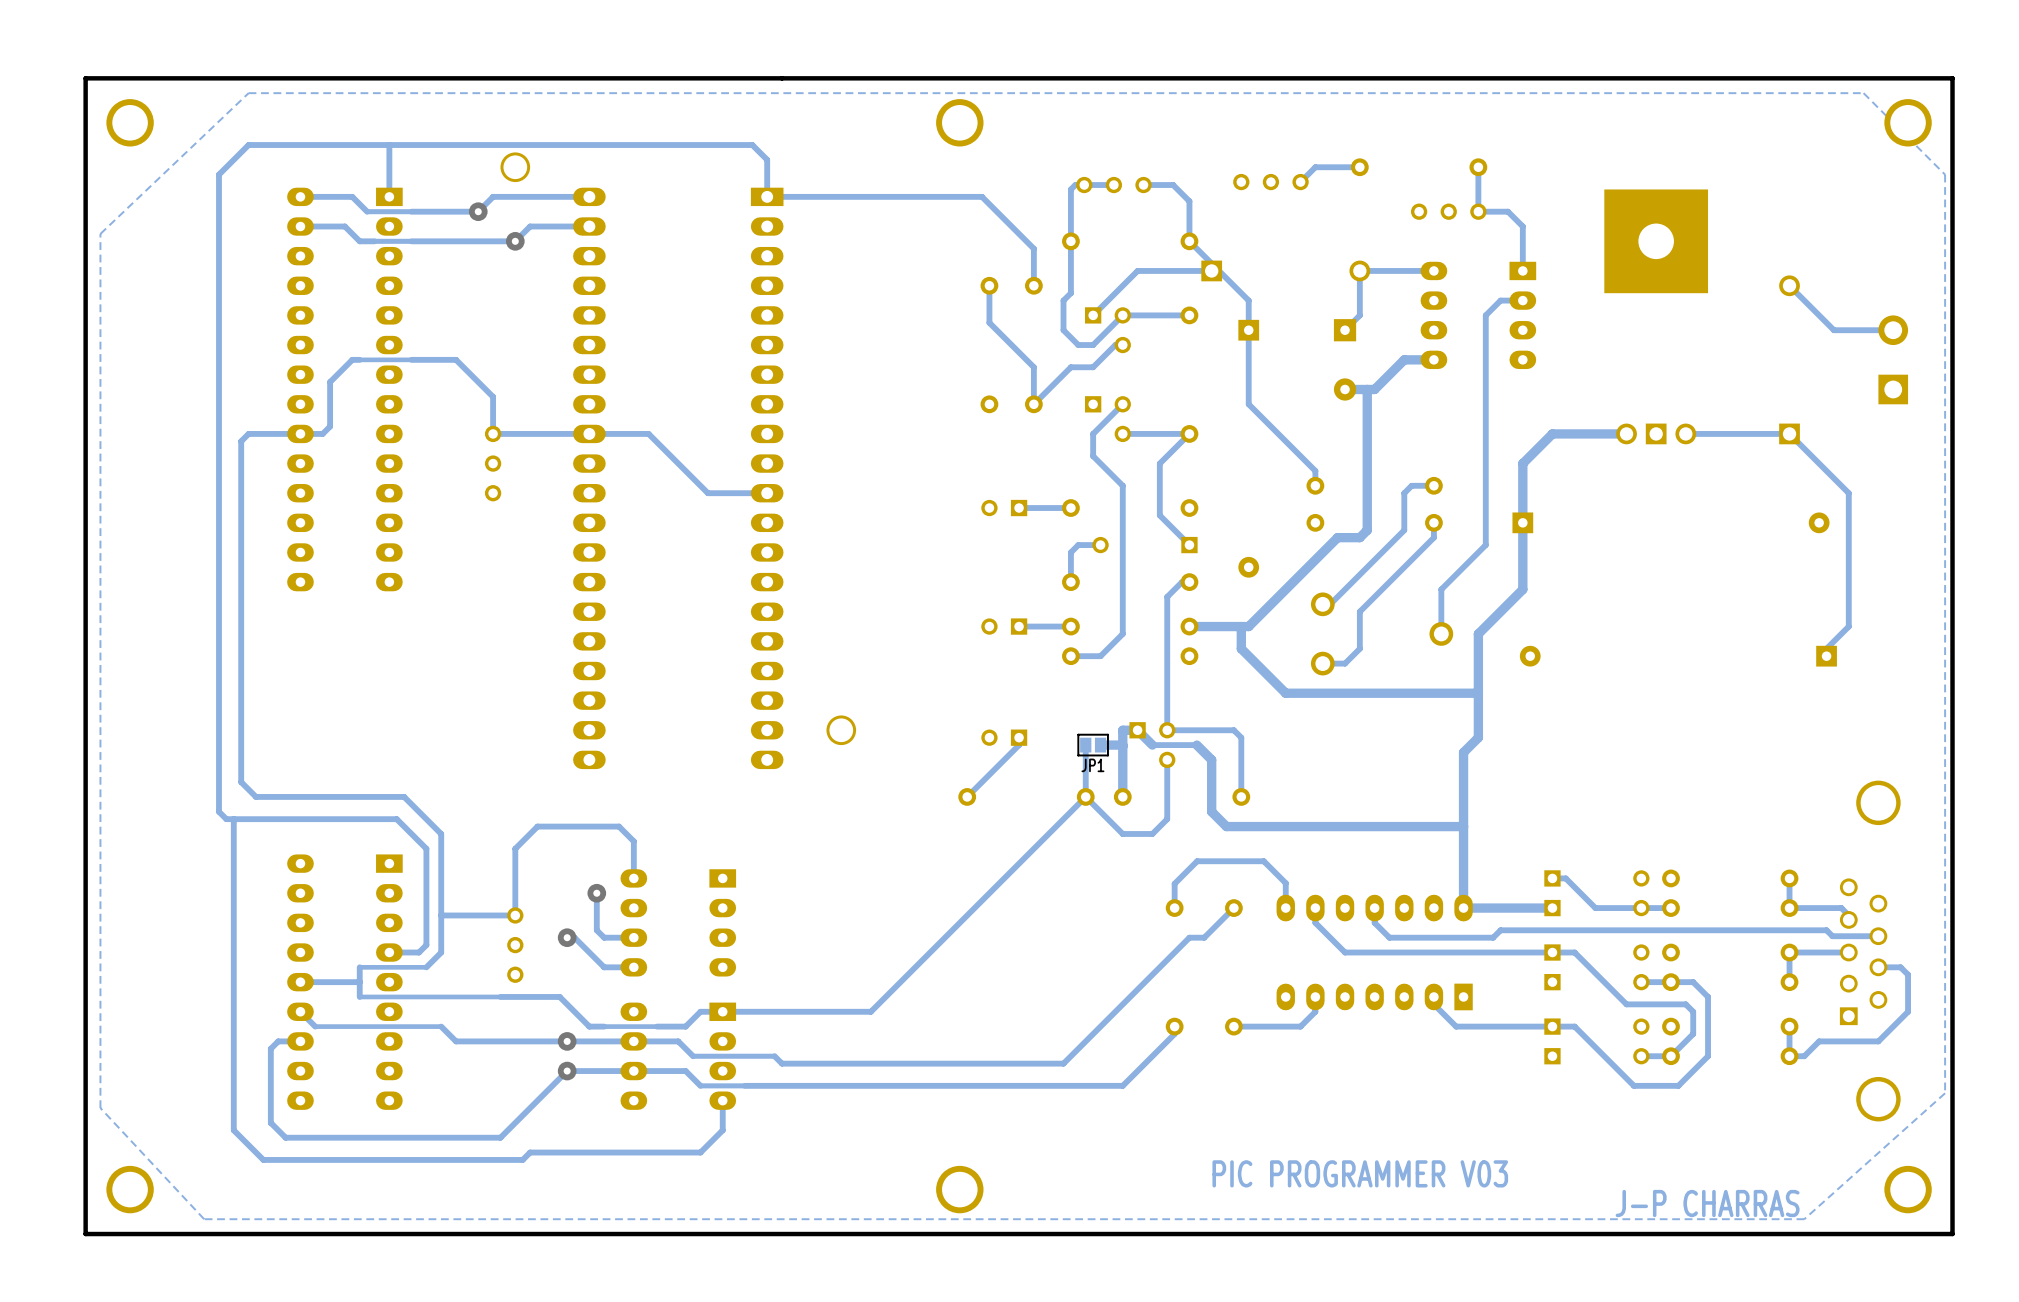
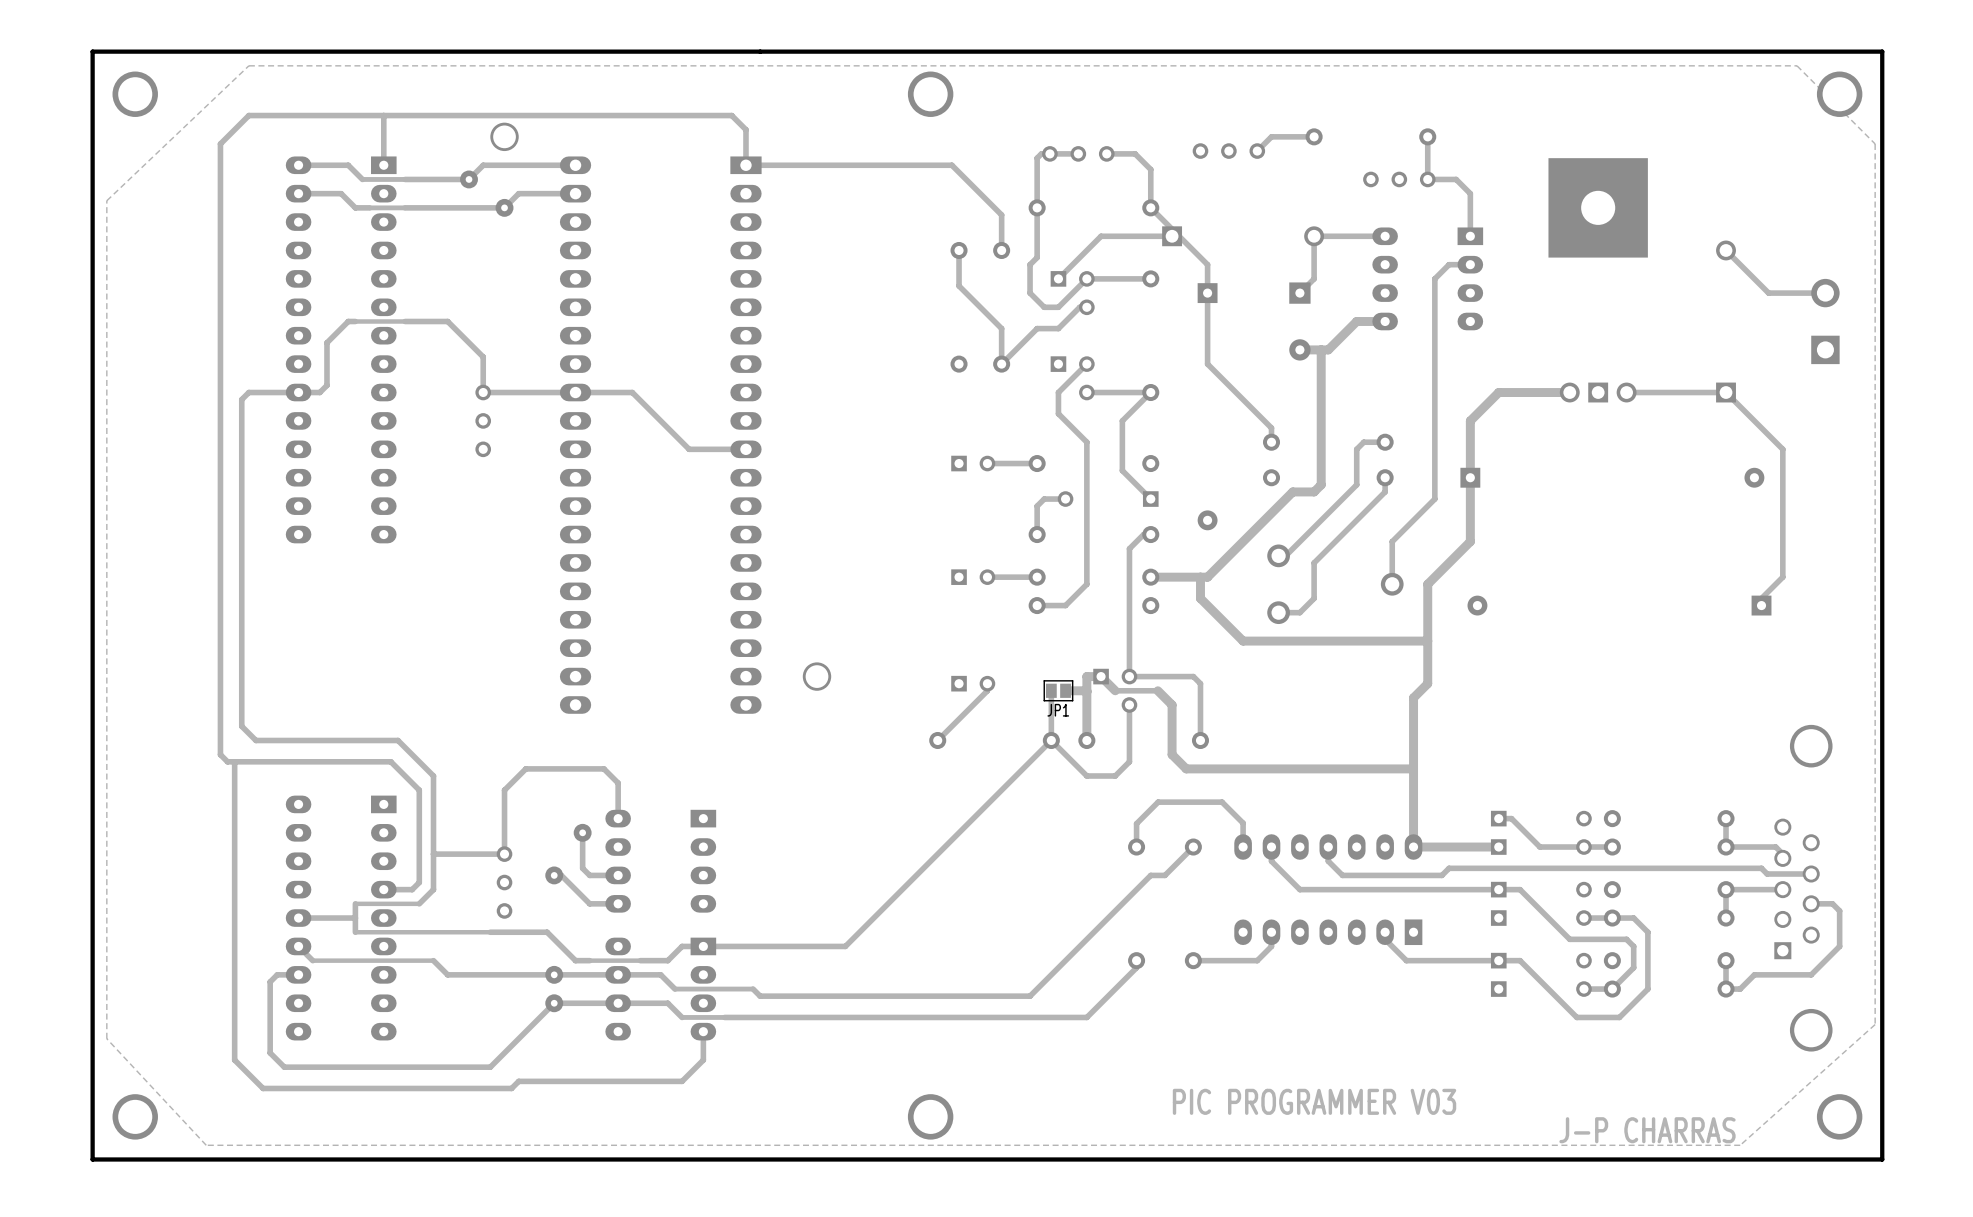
part rotation: 0° (1004, 508) -> 180° (973, 463)
part rotation: 0° (1004, 626) -> 180° (973, 577)
part rotation: 0° (1004, 737) -> 180° (973, 683)

